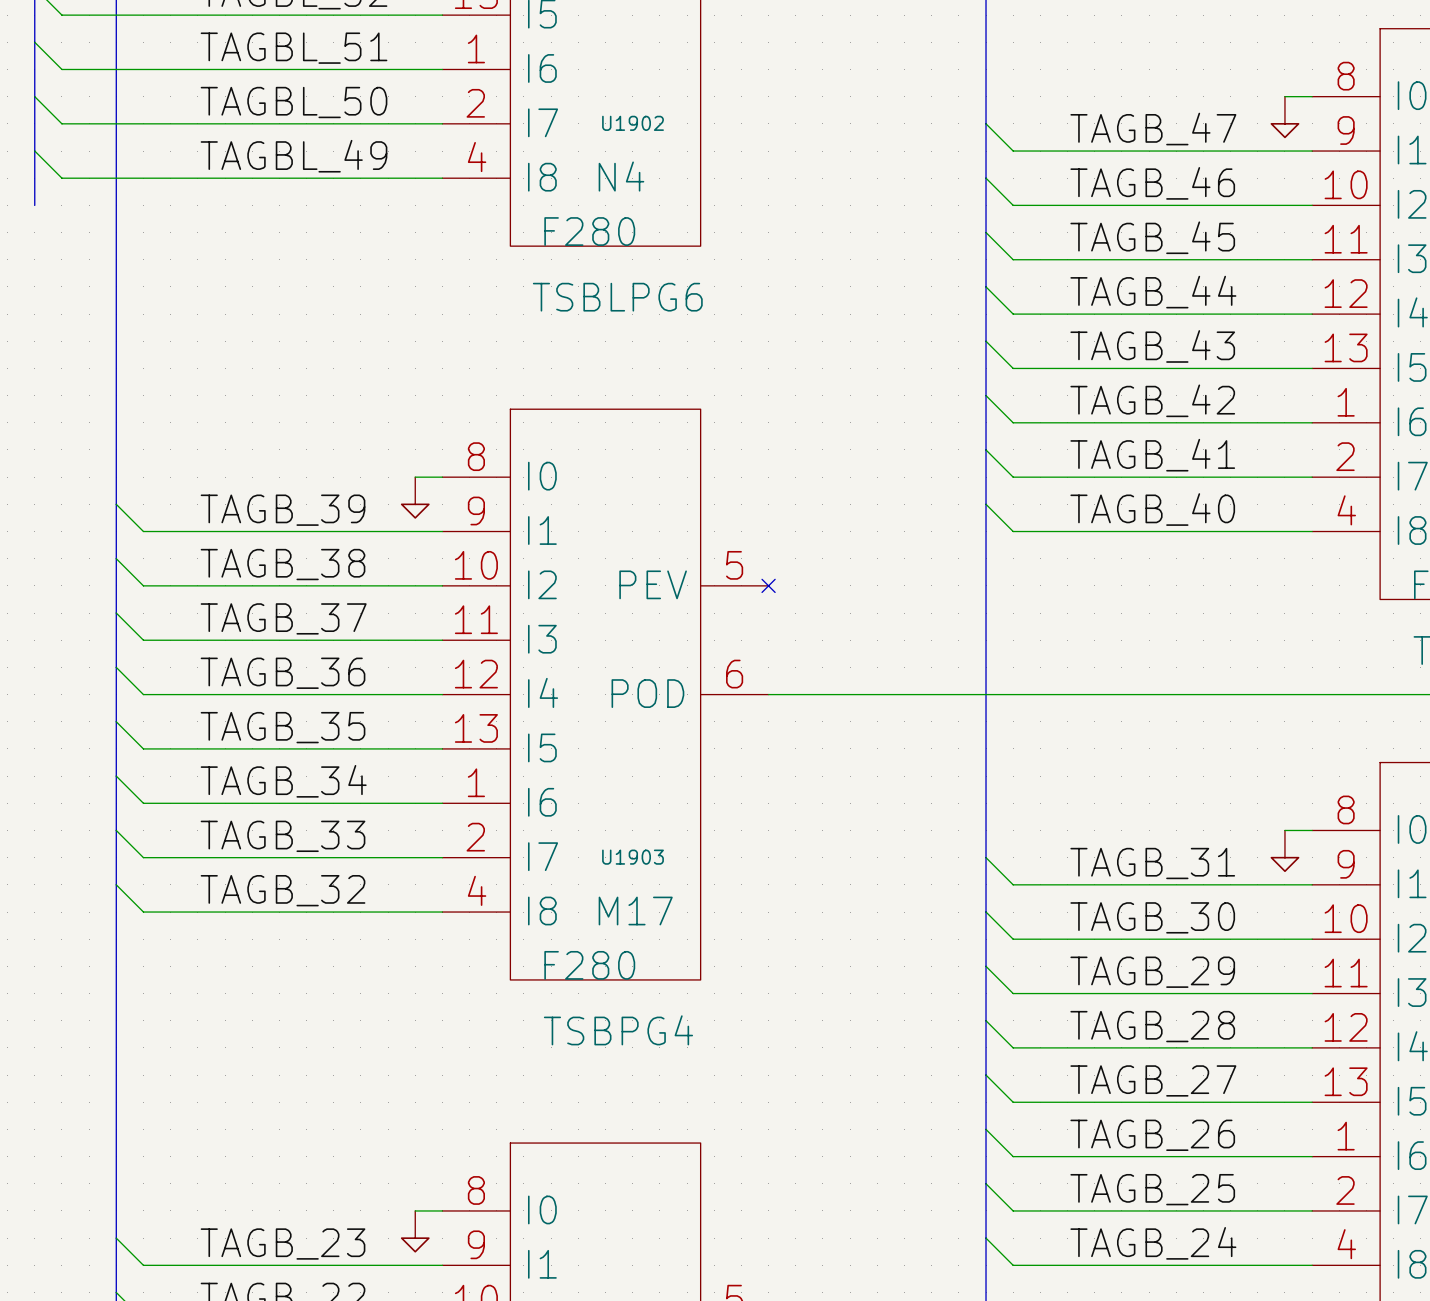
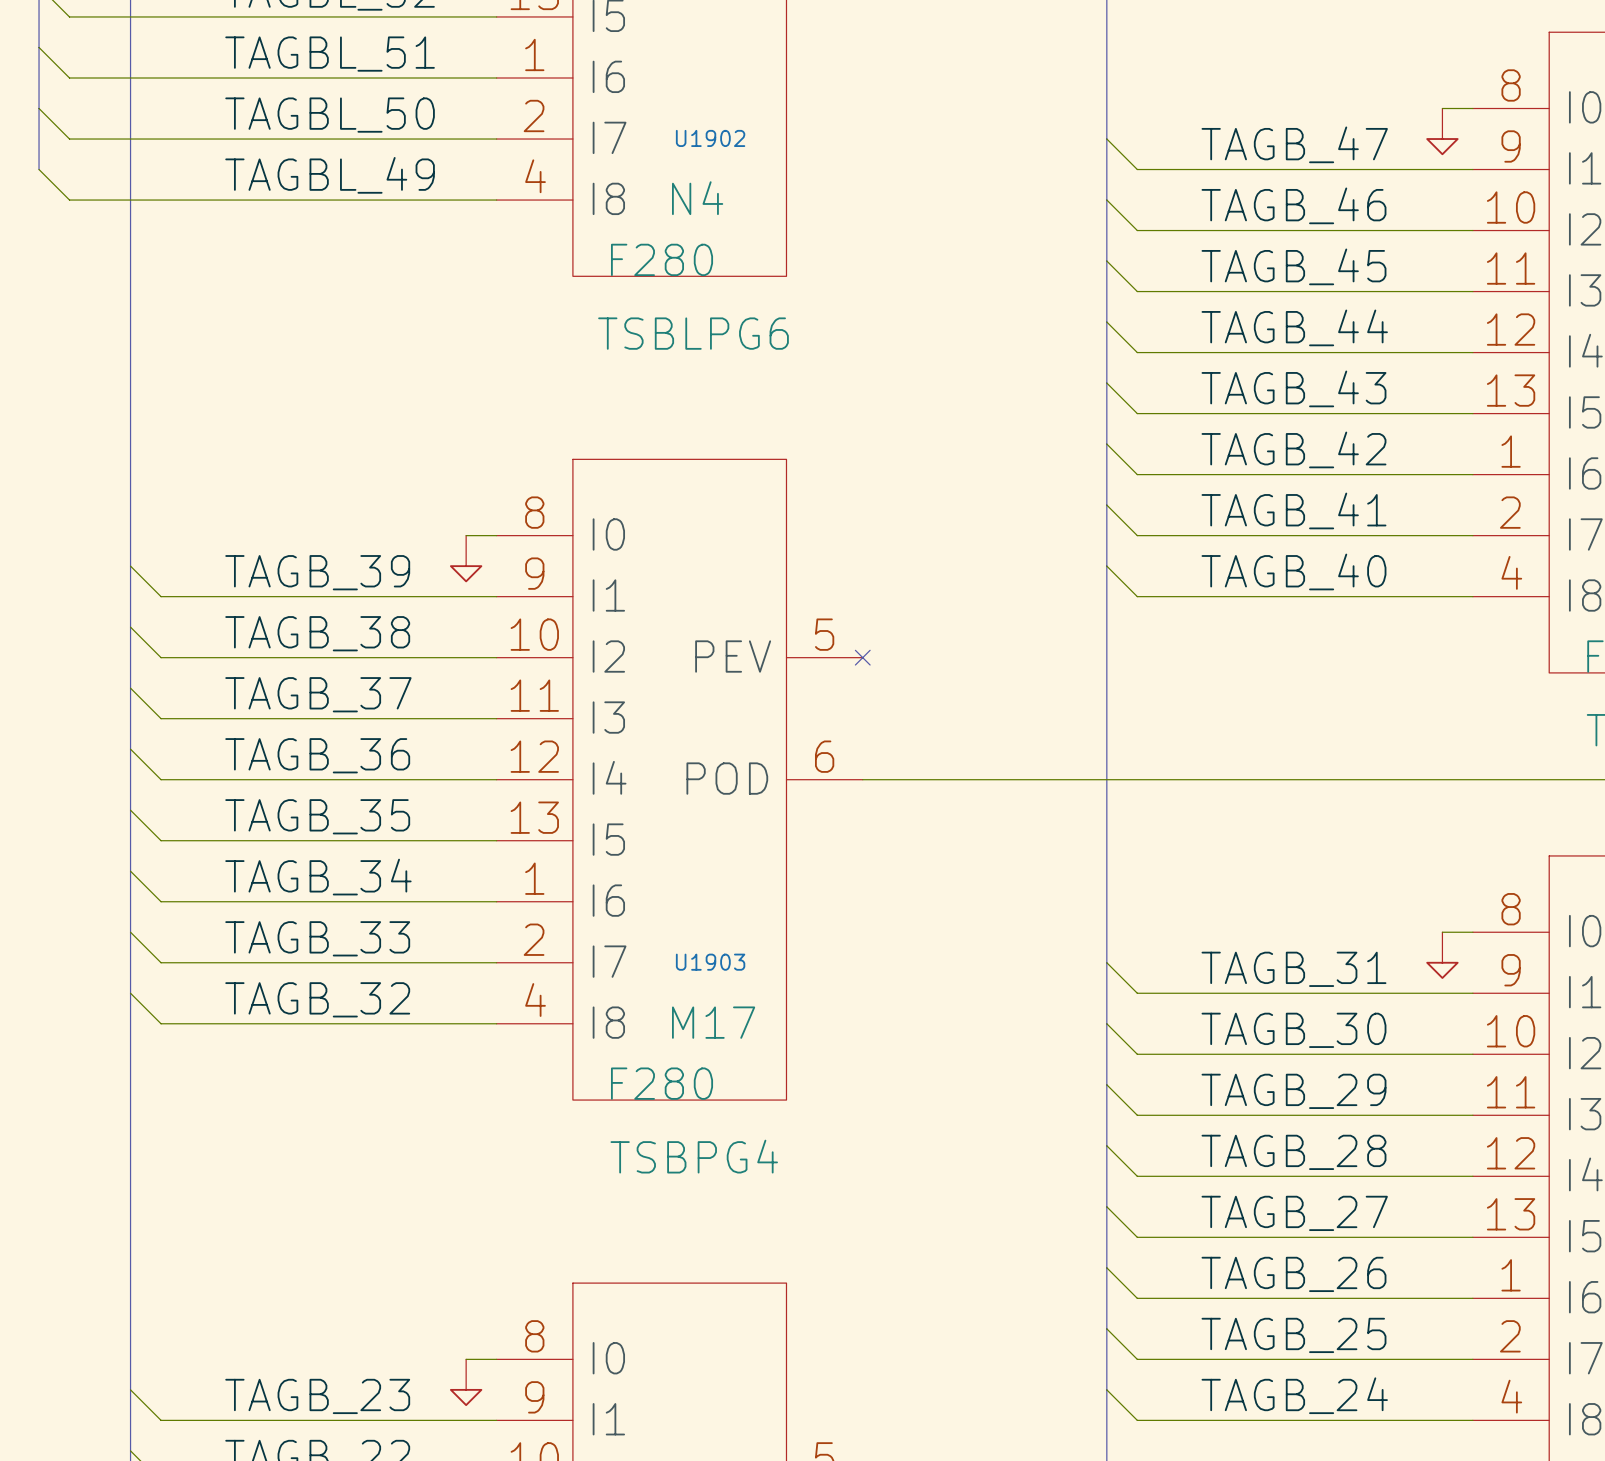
bus: (34, 151) (34, 205) -> none

